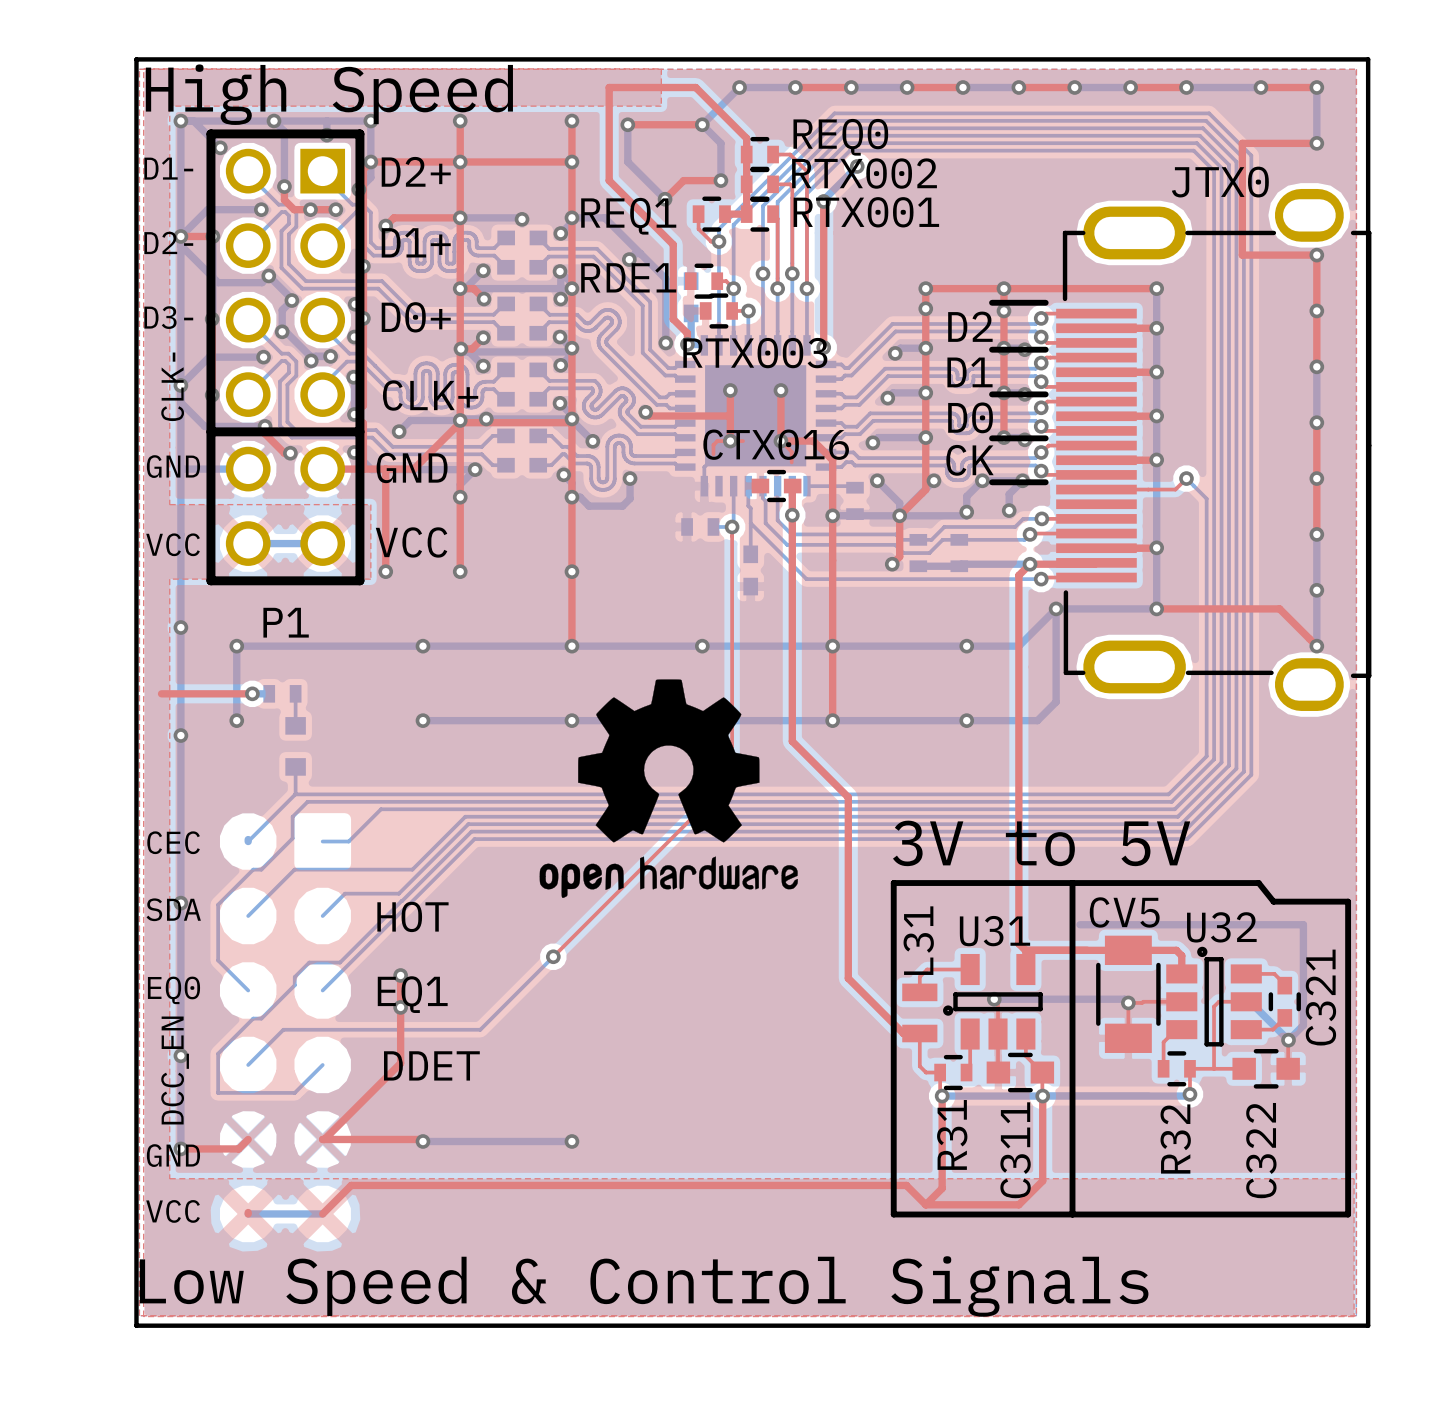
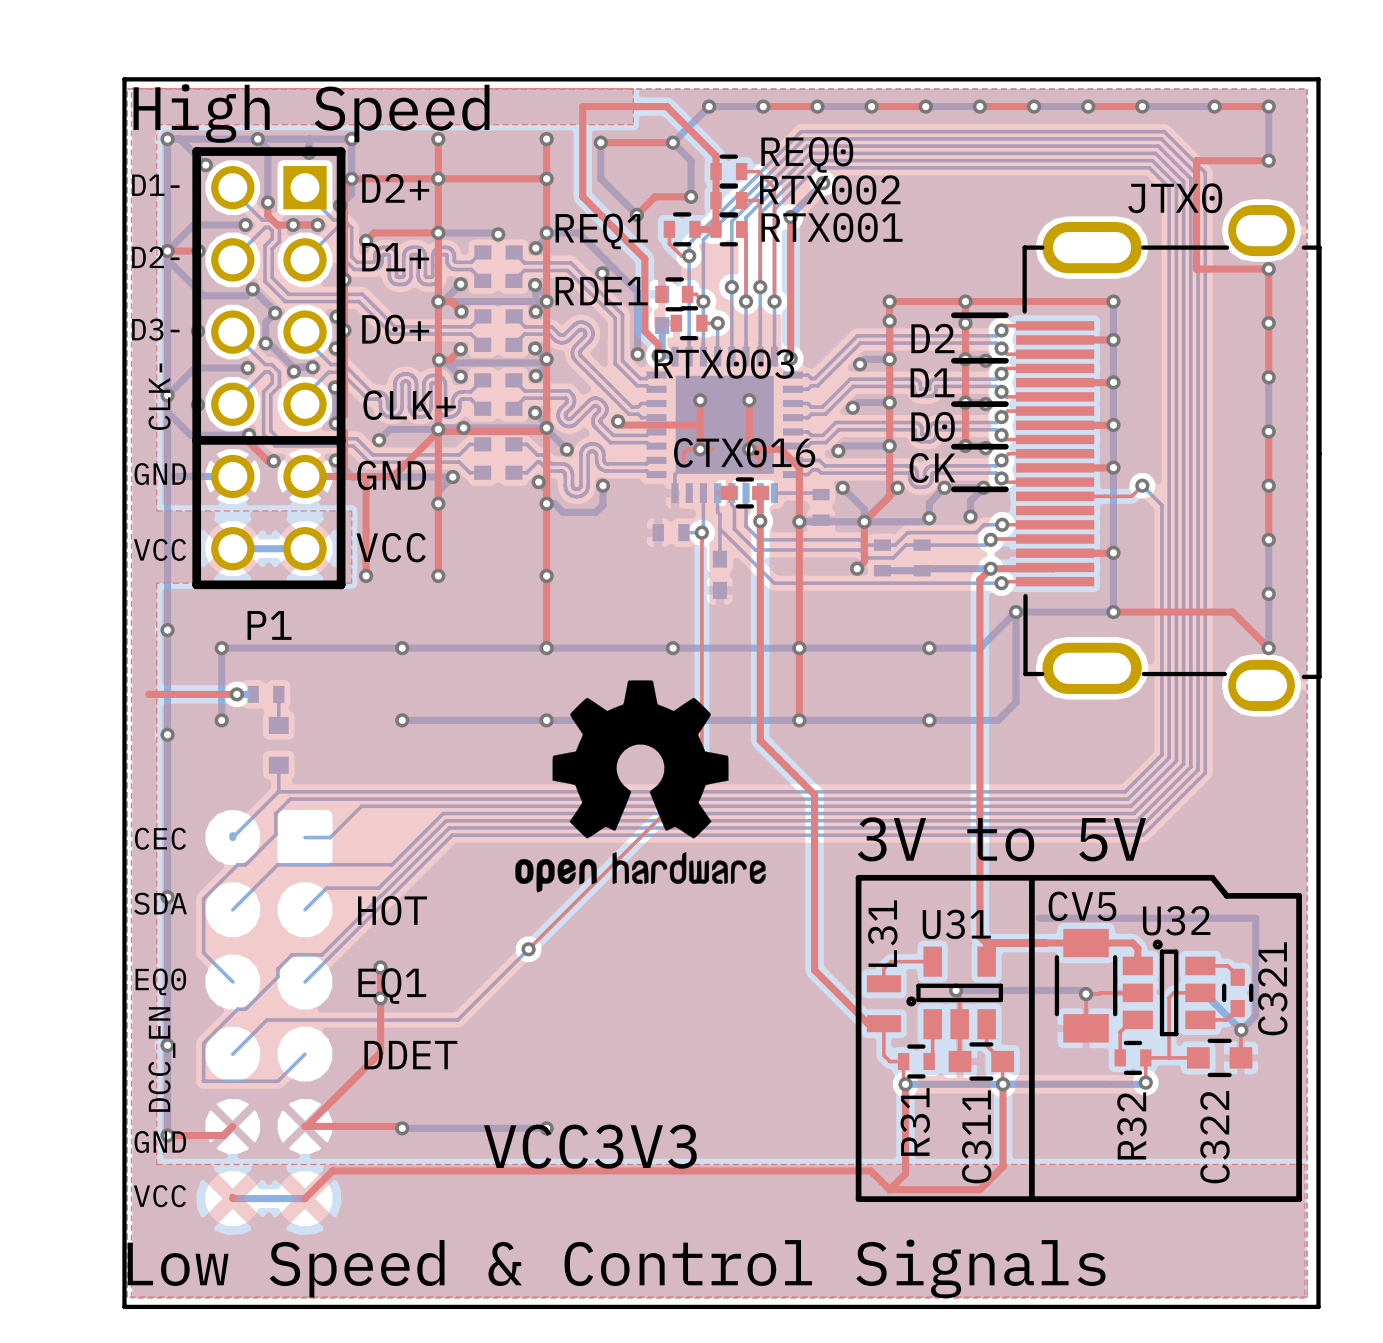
text: none -> VCC3V3 (590, 1146)

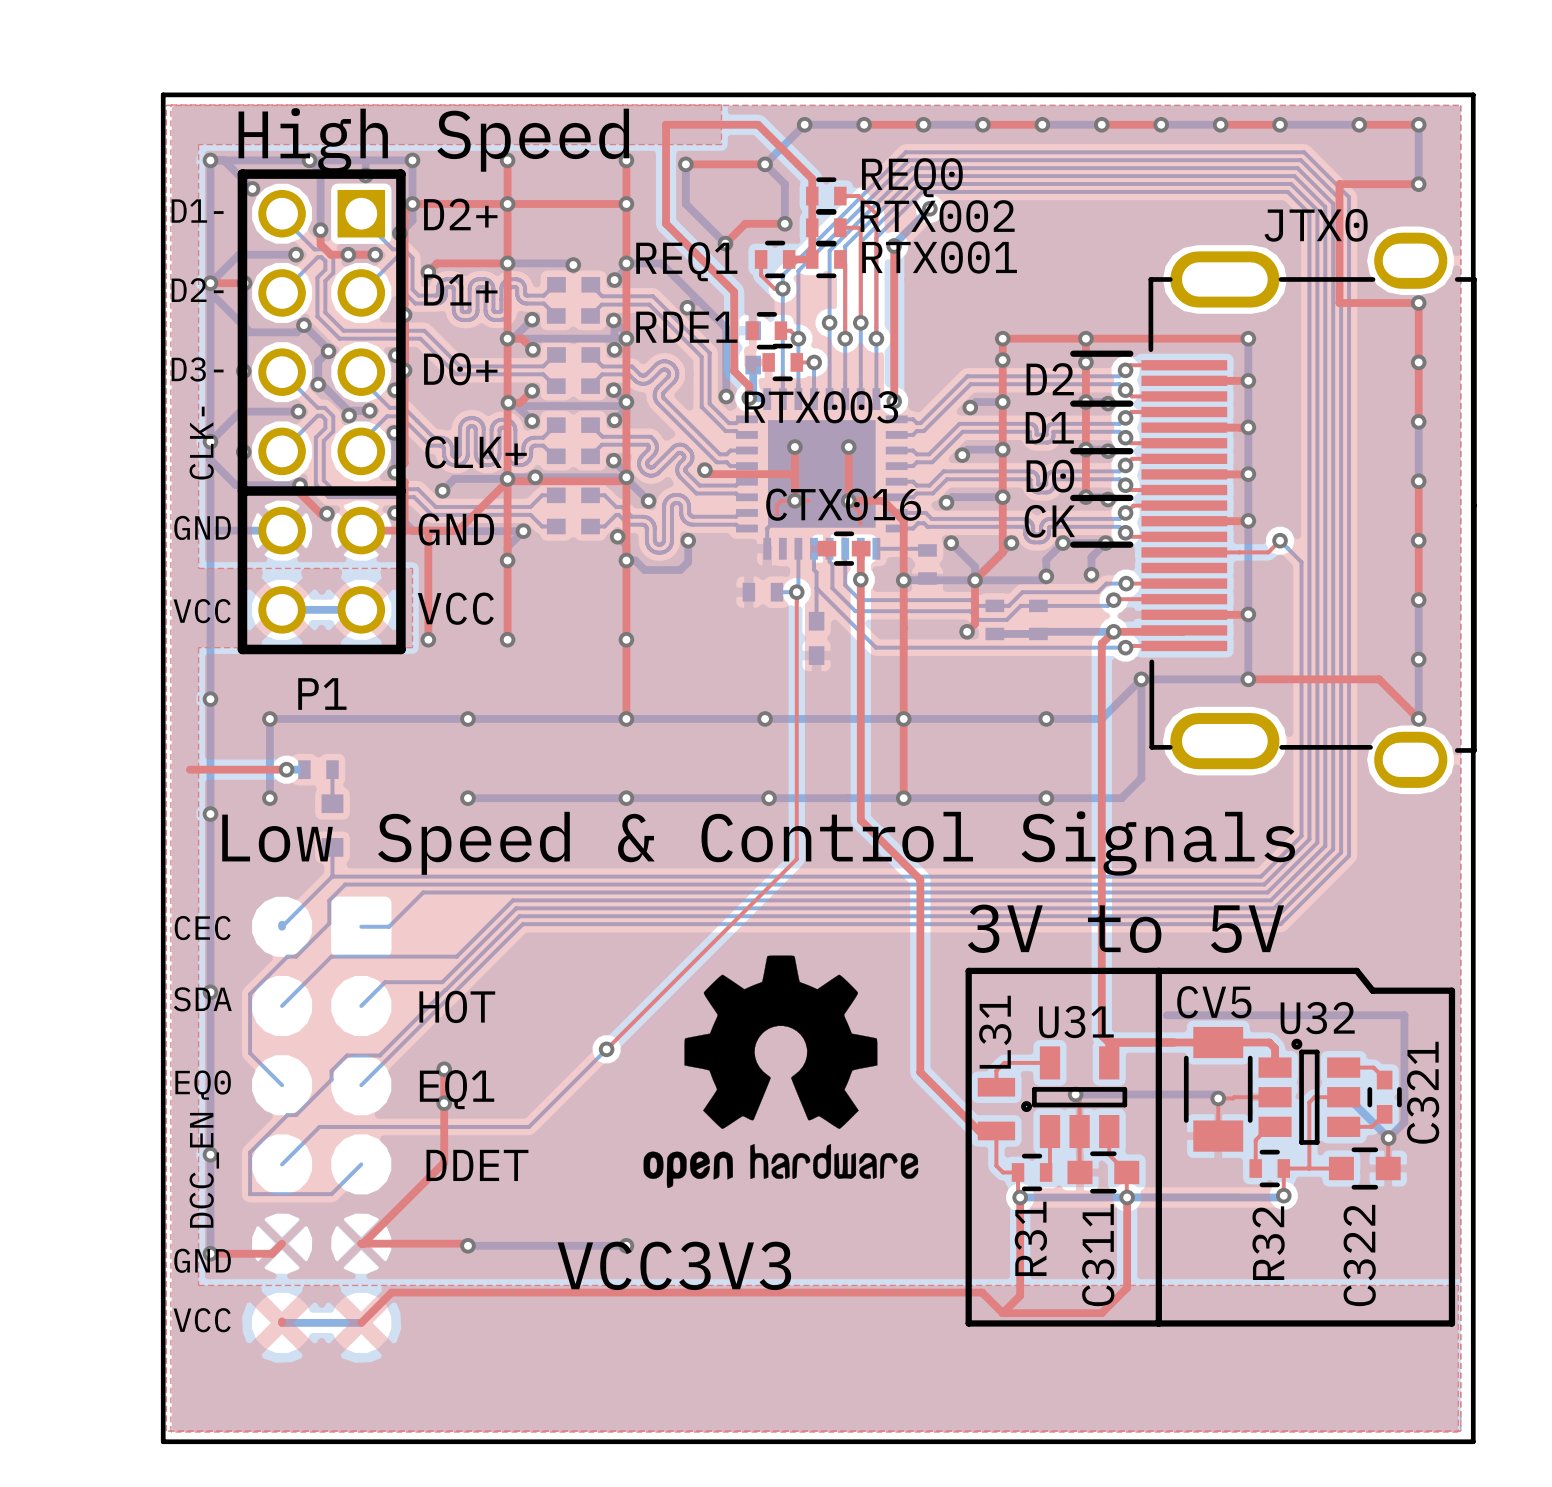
text position: High Speed (311, 113) -> High Speed (433, 140)
drawing position: (640, 786) -> (780, 1071)
text position: Low Speed & Control Signals (616, 1268) -> Low Speed & Control Signals (758, 843)

